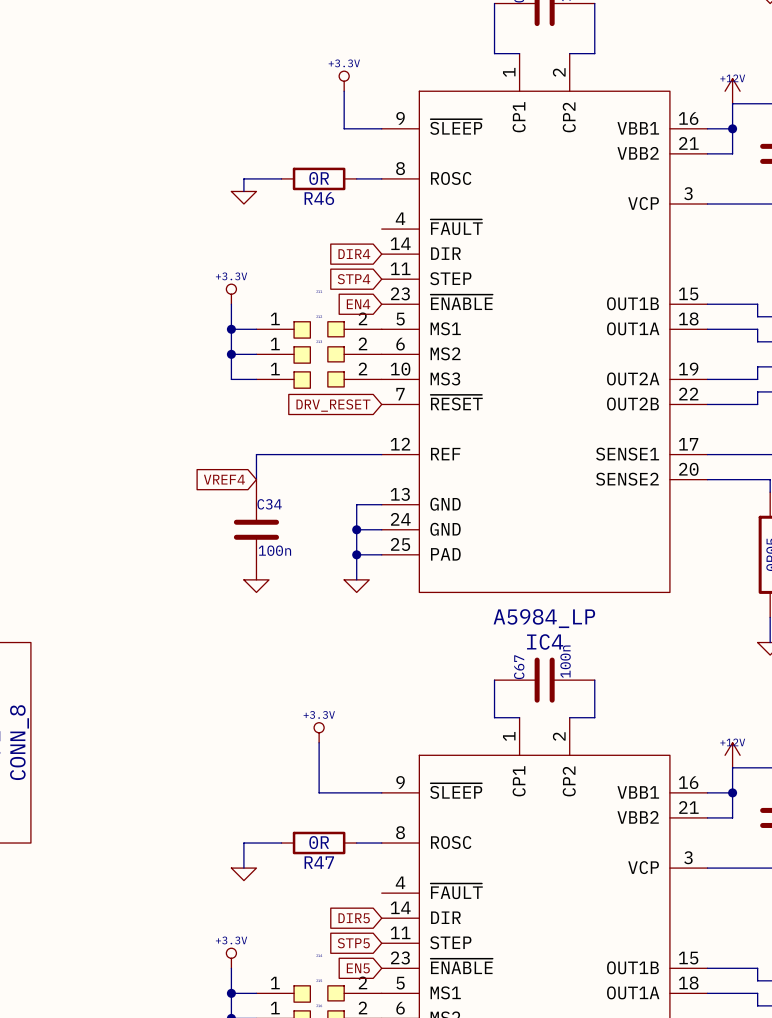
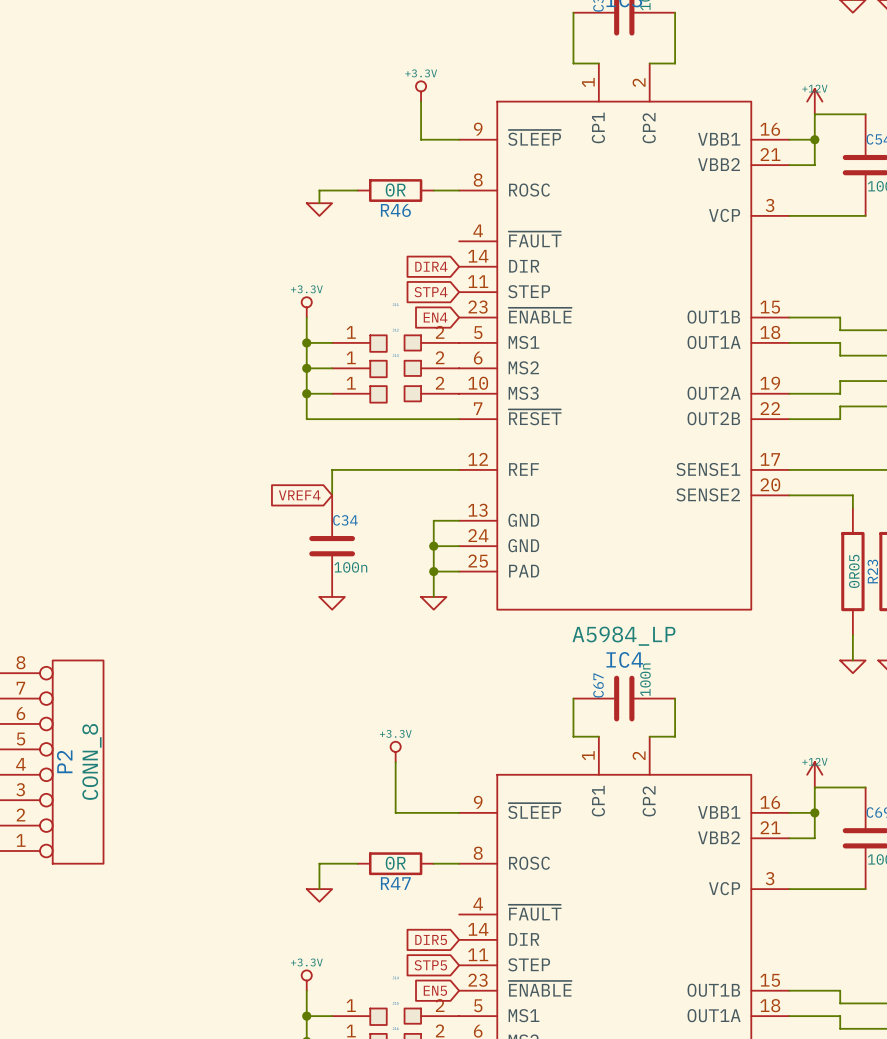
wire: none -> (306, 393) (306, 419) (459, 419)
junction: none -> (306, 393)
global label: DRV_RESET (333, 405) -> none

